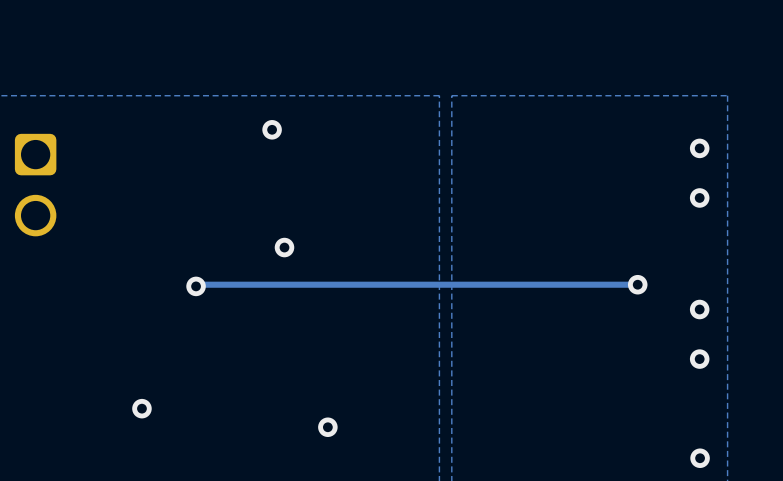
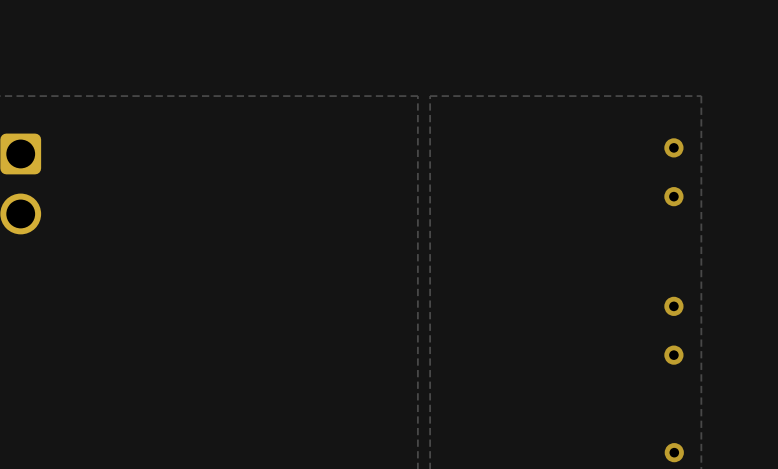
via: (272, 129) -> none
via: (284, 247) -> none
track: (637, 284) (197, 284) (196, 286) -> none
via: (637, 284) -> none
via: (196, 286) -> none
via: (141, 408) -> none
via: (327, 427) -> none

